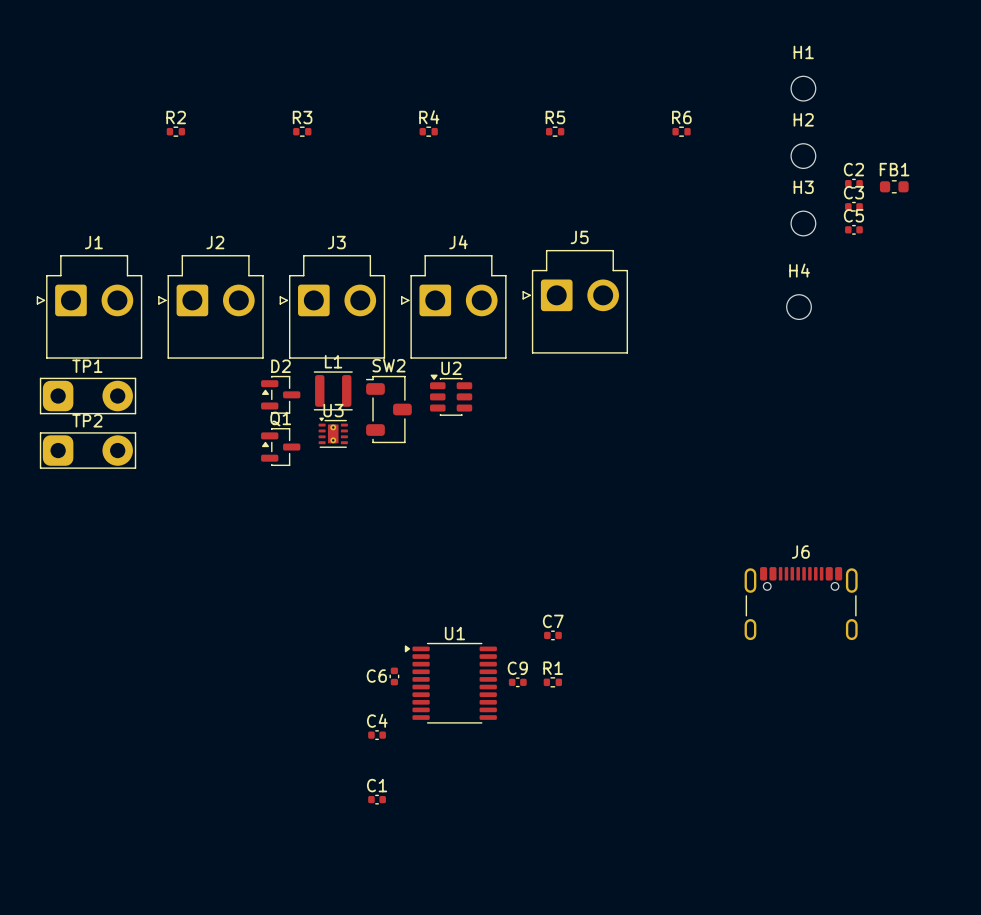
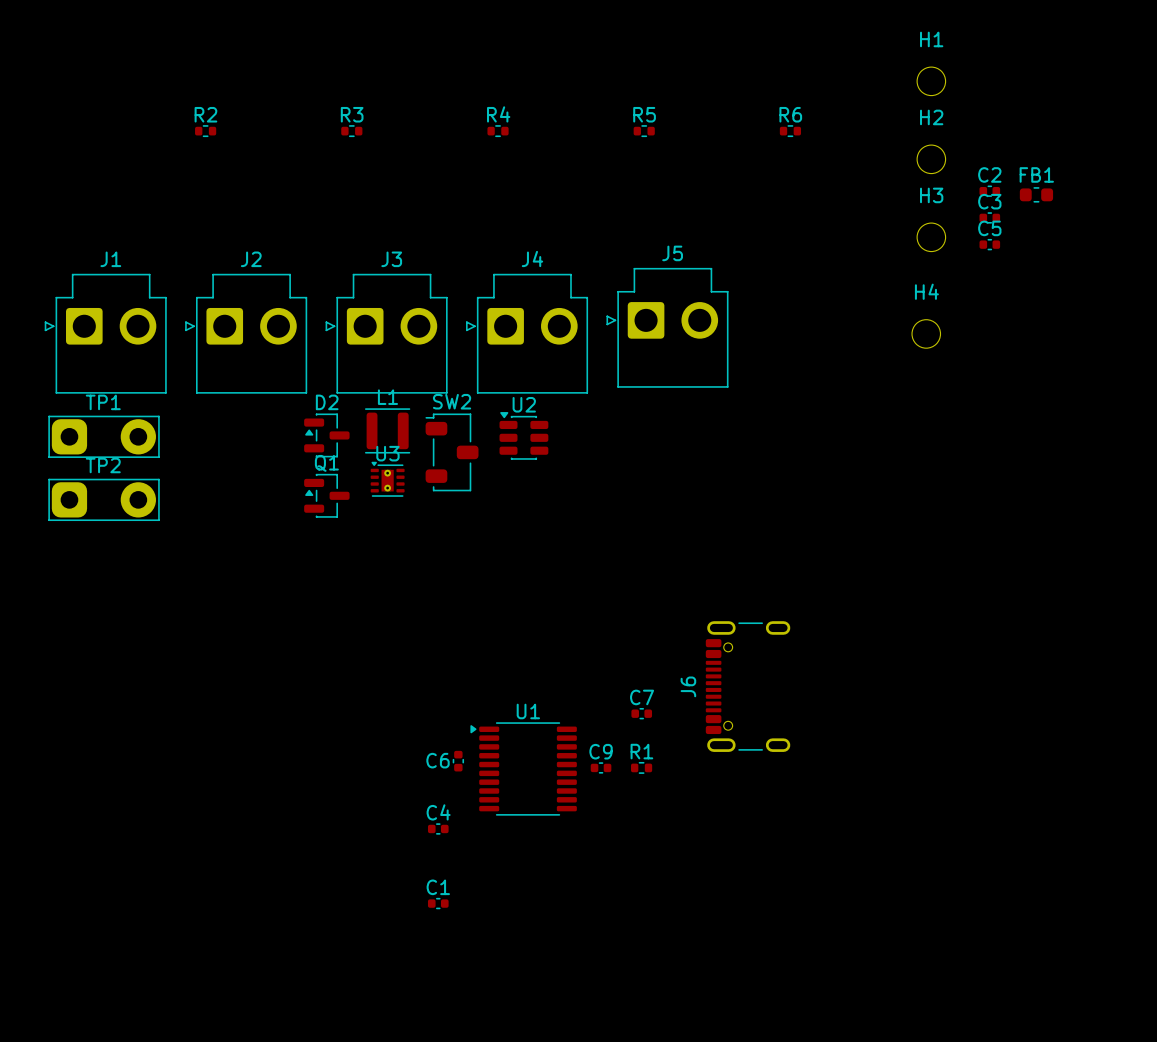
J6 rotation: 0° (801, 603) -> 90° counterclockwise (748, 686)
J6 position: (801, 603) -> (748, 686)

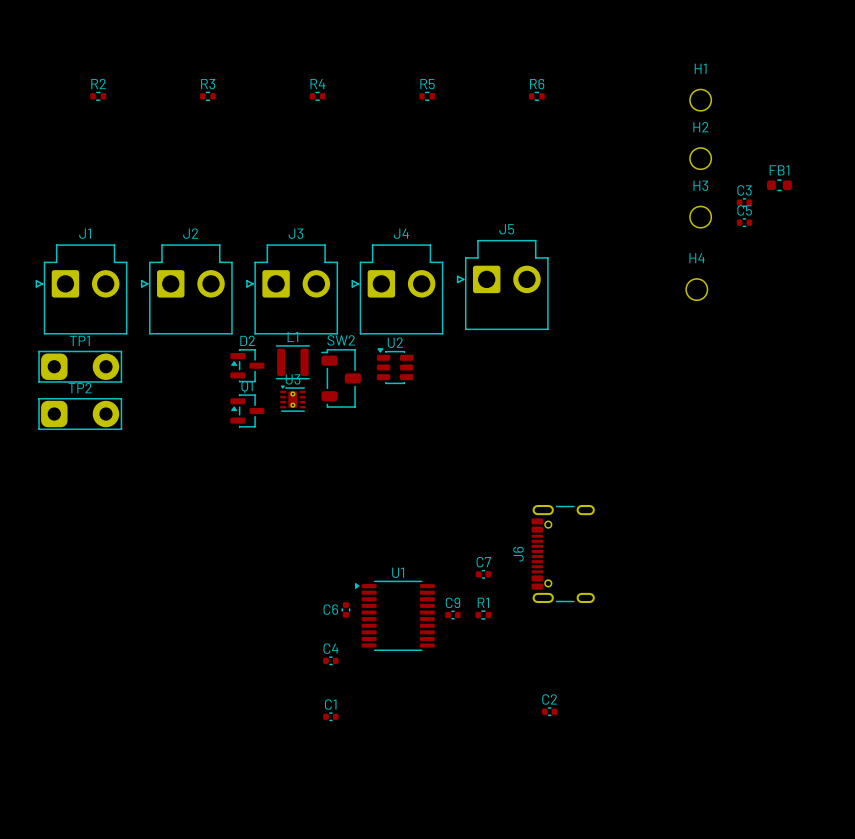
R2 position: (205, 131) -> (98, 96)
R3 position: (351, 131) -> (207, 96)
R4 position: (498, 131) -> (317, 96)
R5 position: (644, 131) -> (427, 96)
R6 position: (790, 131) -> (536, 96)
C2 position: (989, 191) -> (549, 711)

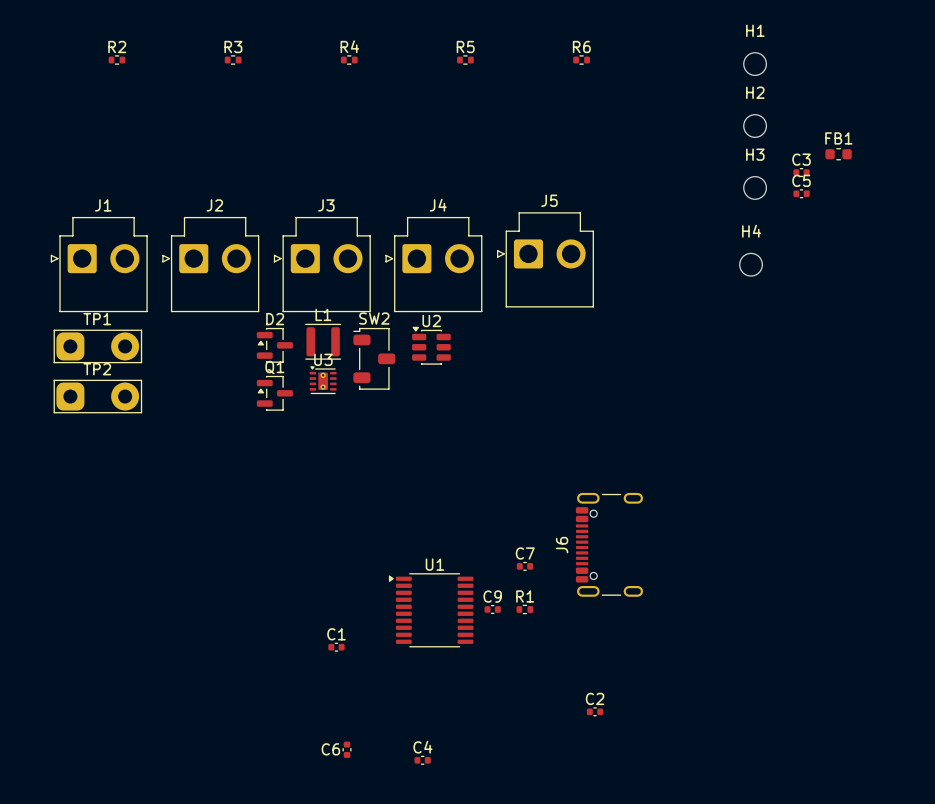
C6 position: (345, 609) -> (347, 749)
C4 position: (330, 660) -> (422, 760)
C1 position: (330, 716) -> (336, 647)

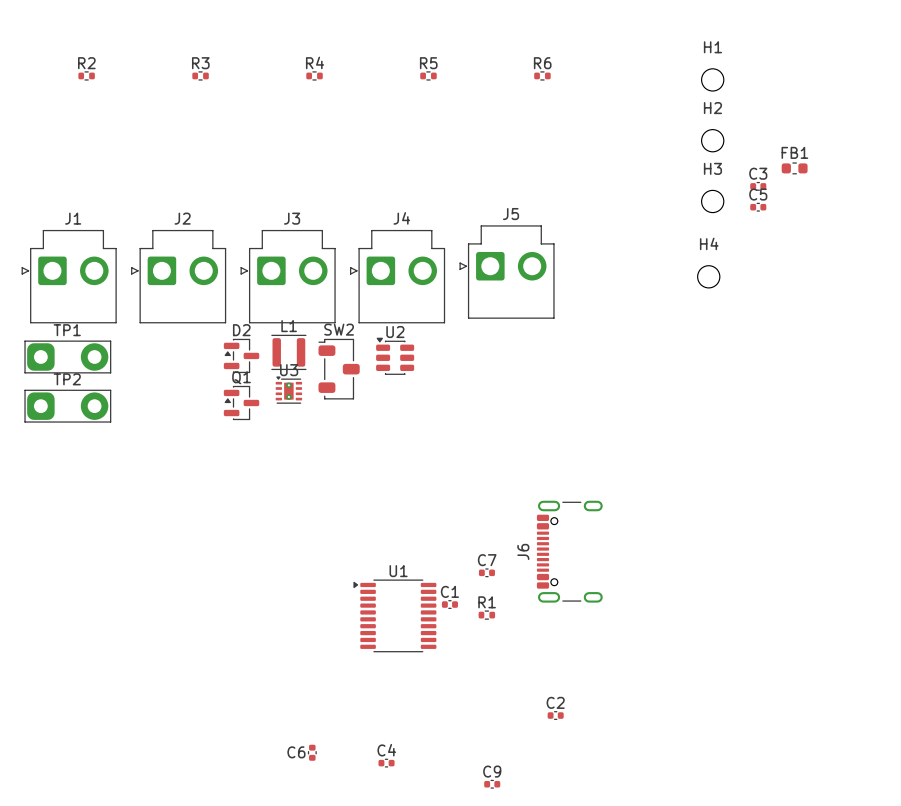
C9 position: (492, 609) -> (492, 784)
C1 position: (336, 647) -> (449, 604)

